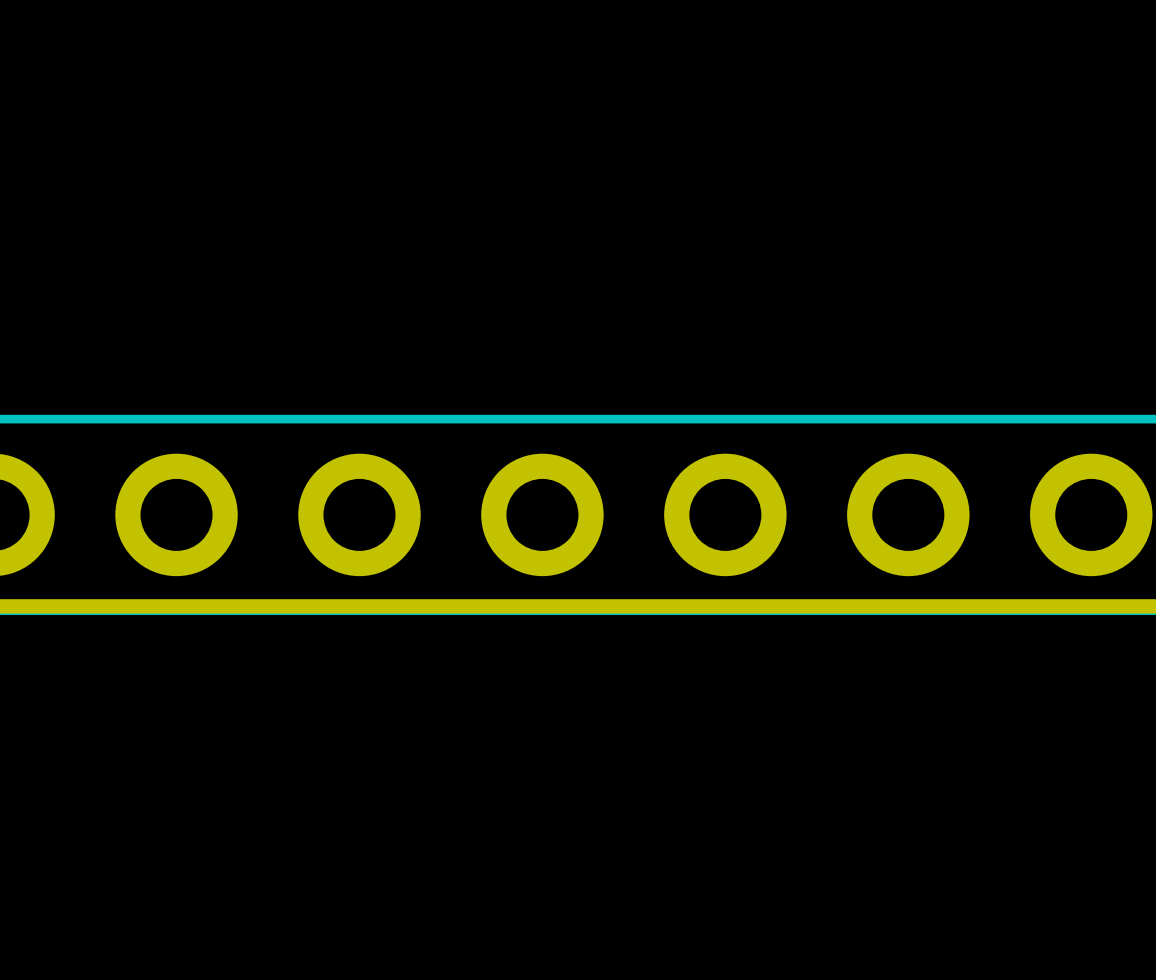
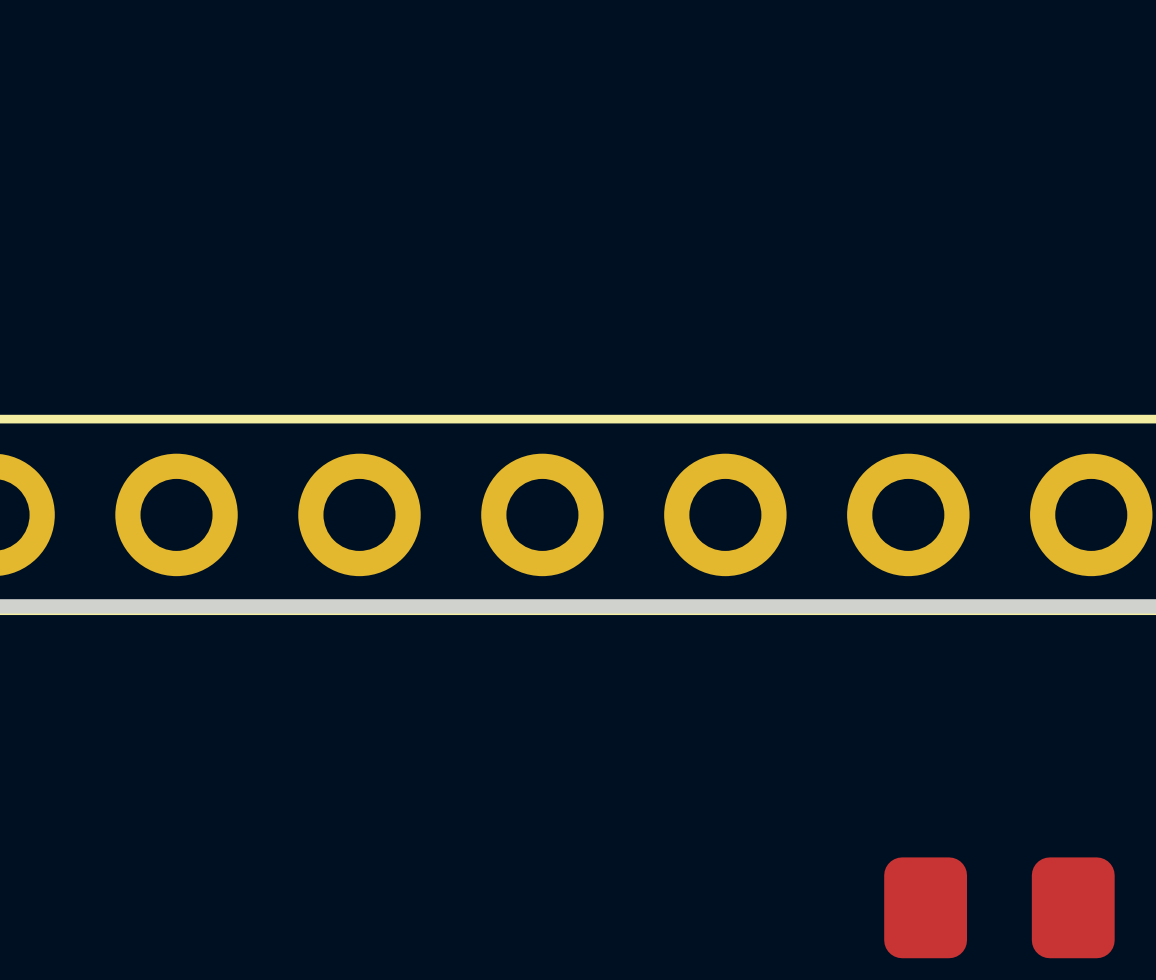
part: none -> (999, 907)

